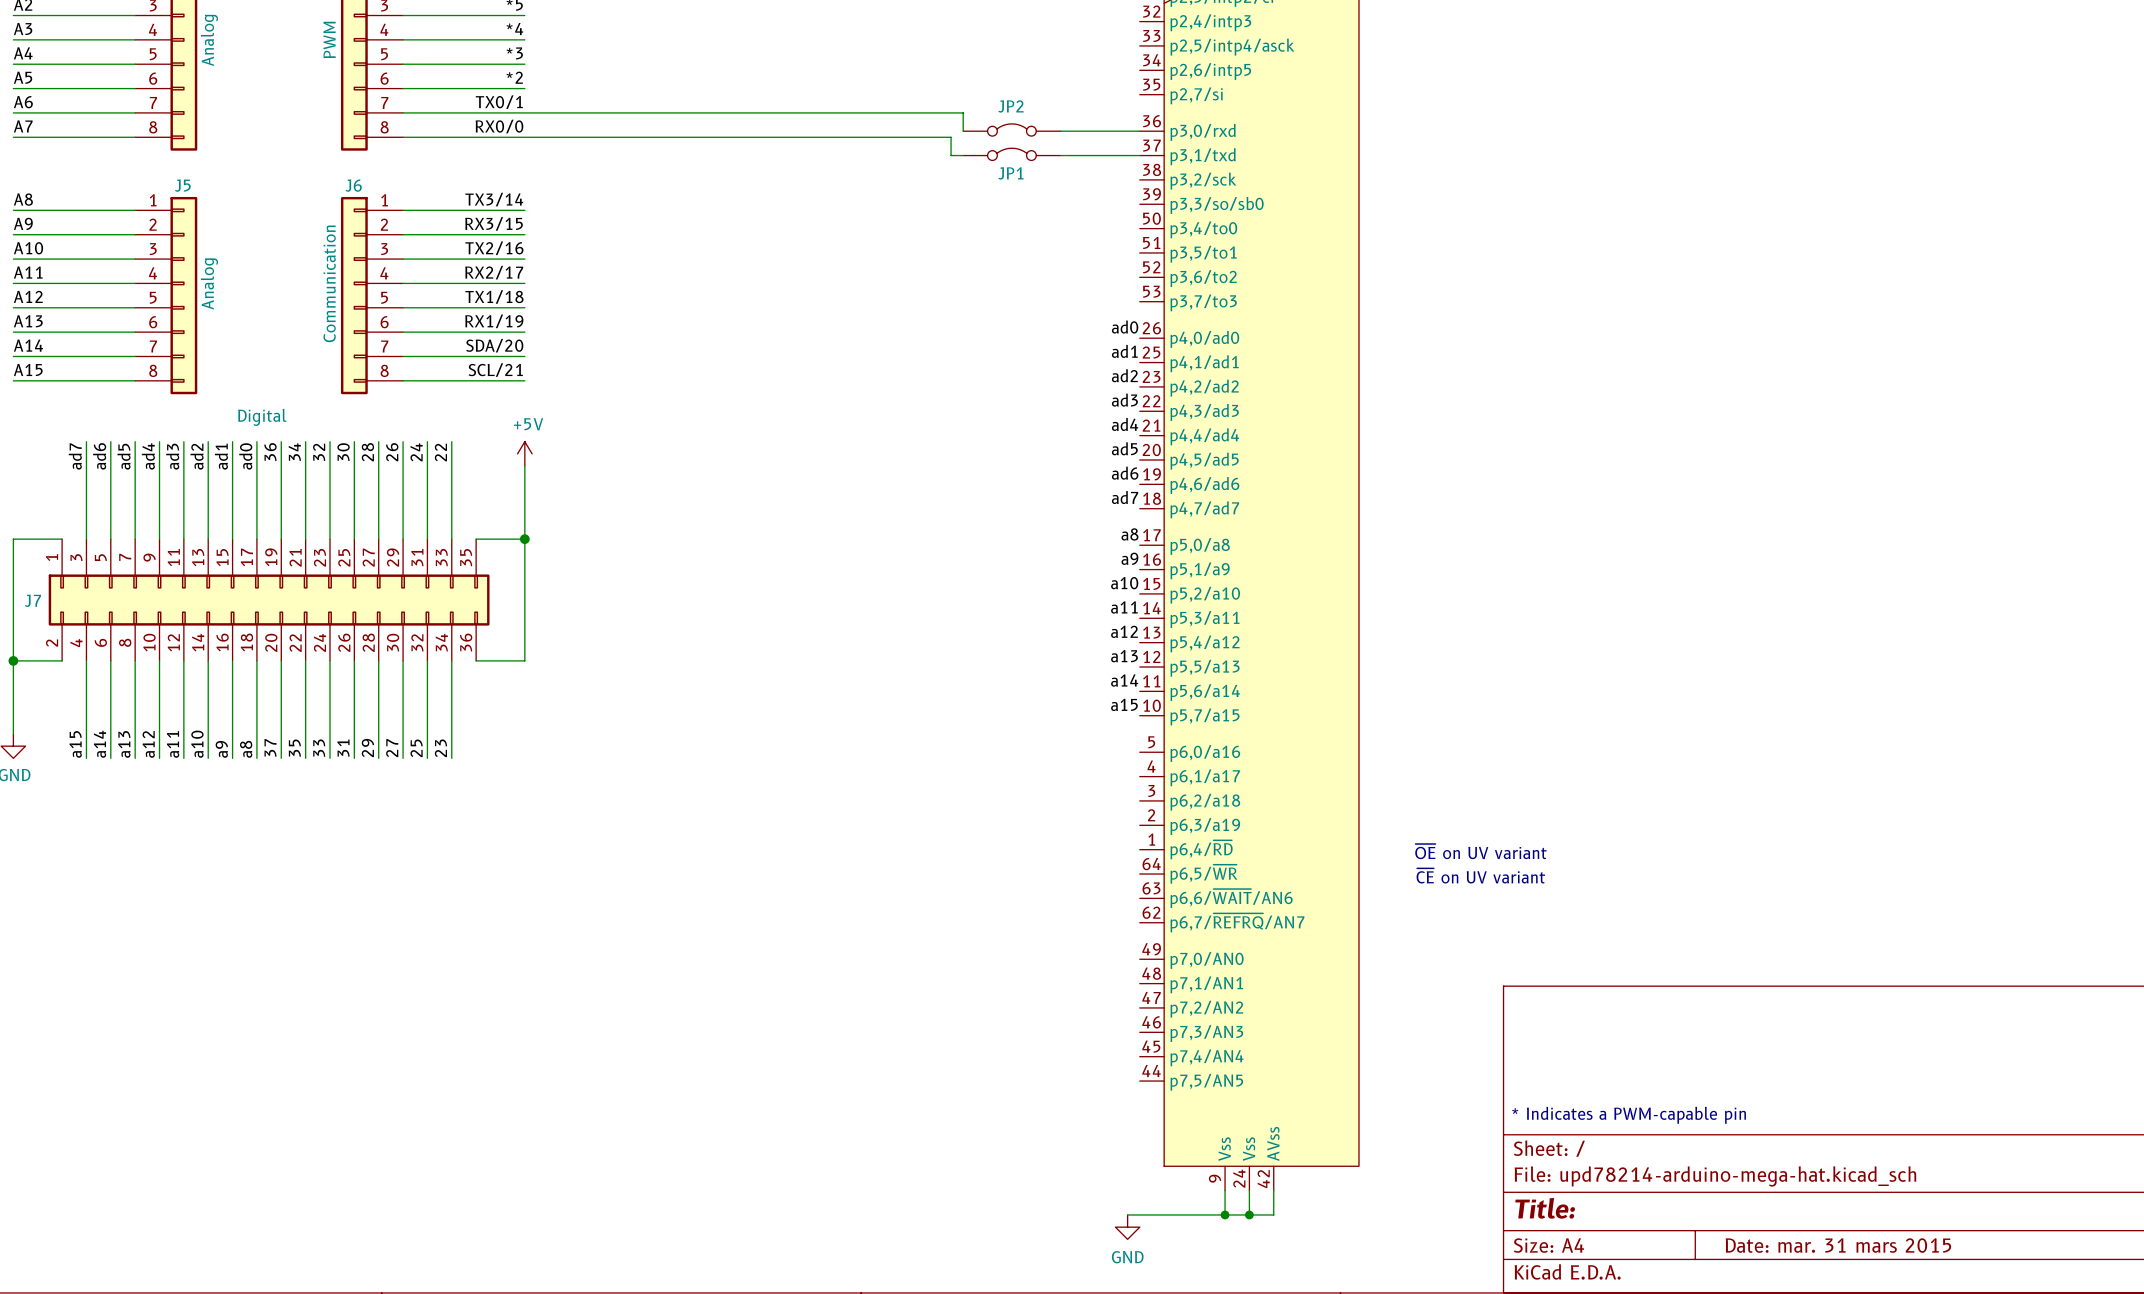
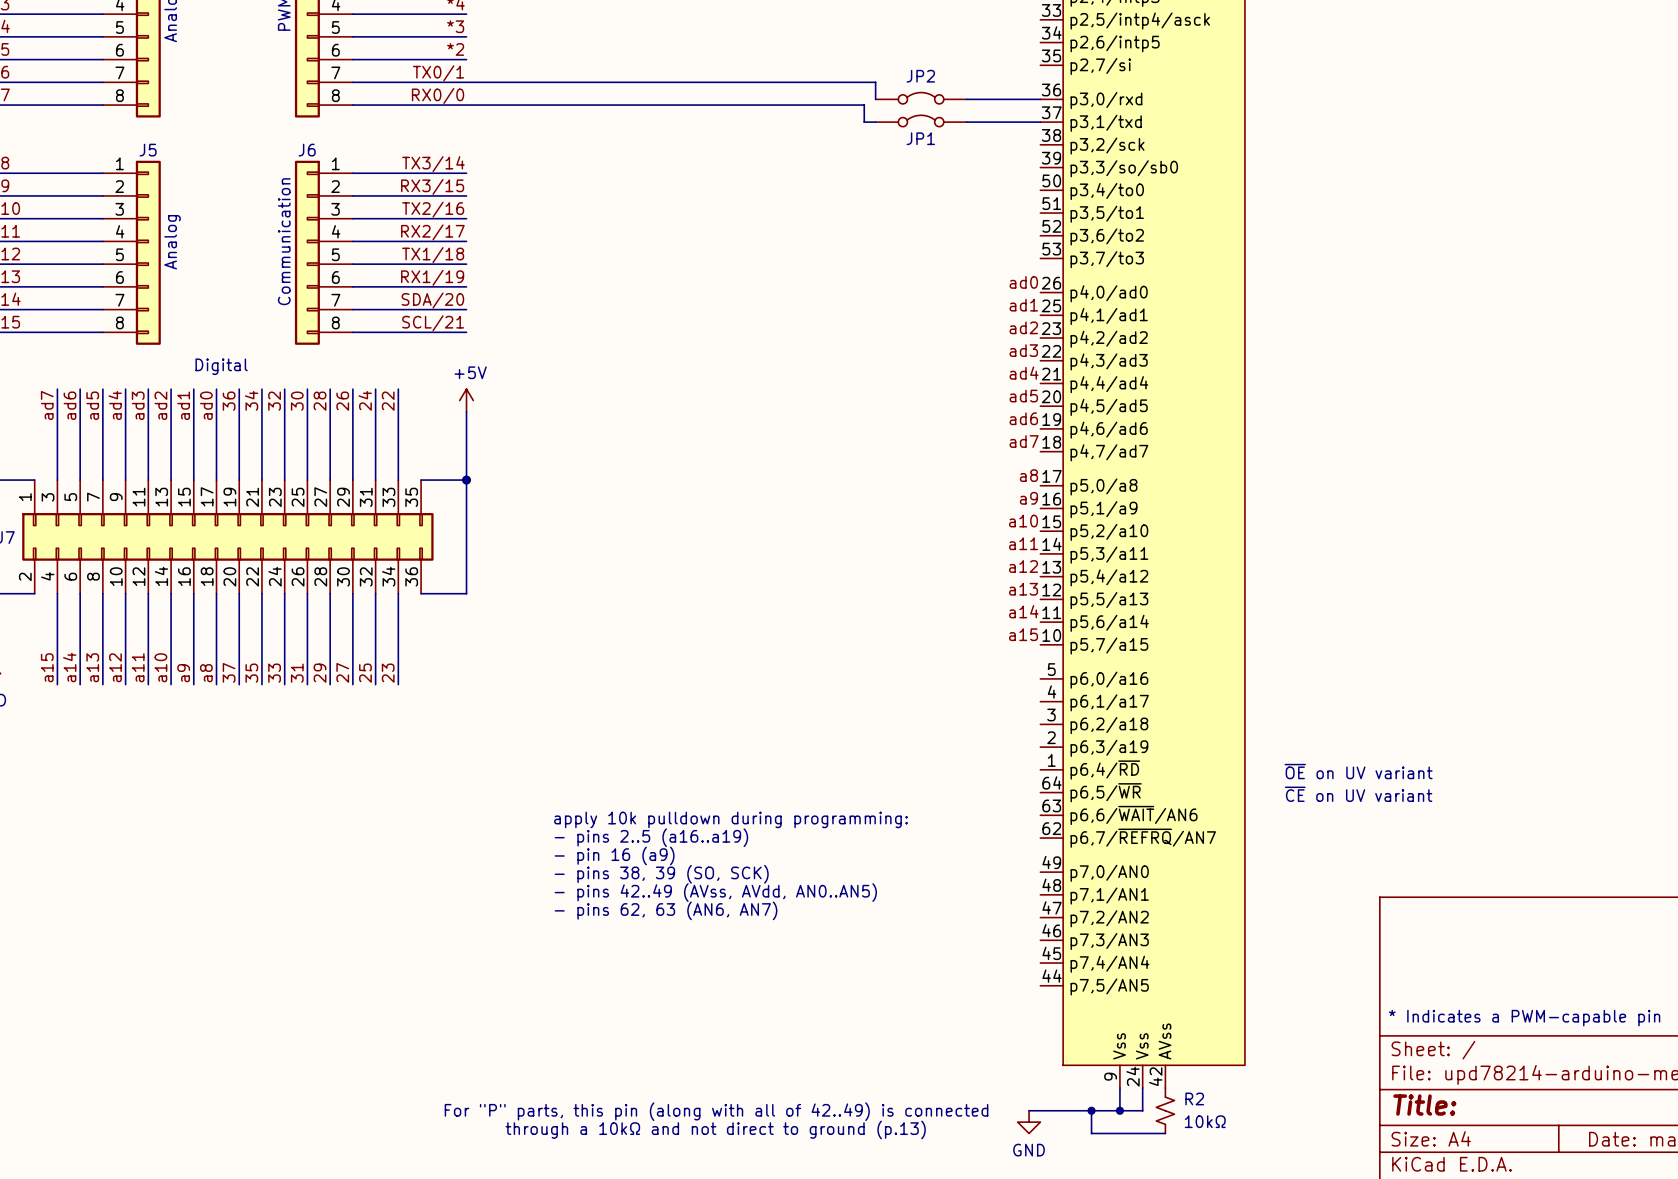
text: none -> apply 10k pulldown during programming: (730, 819)
text: none -> - pins 2..5 (a16..a19) (651, 837)
text: none -> - pin 16 (a9) (614, 855)
text: none -> - pins 38, 39 (SO, SCK) (661, 874)
text: none -> - pins 42..49 (AVss, AVdd, AN0..AN5) (715, 892)
text: none -> - pins 62, 63 (AN6, AN7) (666, 910)
wire: (1273, 1190) (1273, 1214) (1249, 1214) -> none
wire: none -> (1091, 1110) (1091, 1133) (1165, 1133)
junction position: (1249, 1214) -> (1091, 1110)
R2: none -> 10kΩ (1165, 1110)
text: none -> For "P" parts, this pin (along with all of 42..49) is connected (716, 1111)
text: none -> through a 10kΩ and not direct to ground (p.13) (715, 1129)

